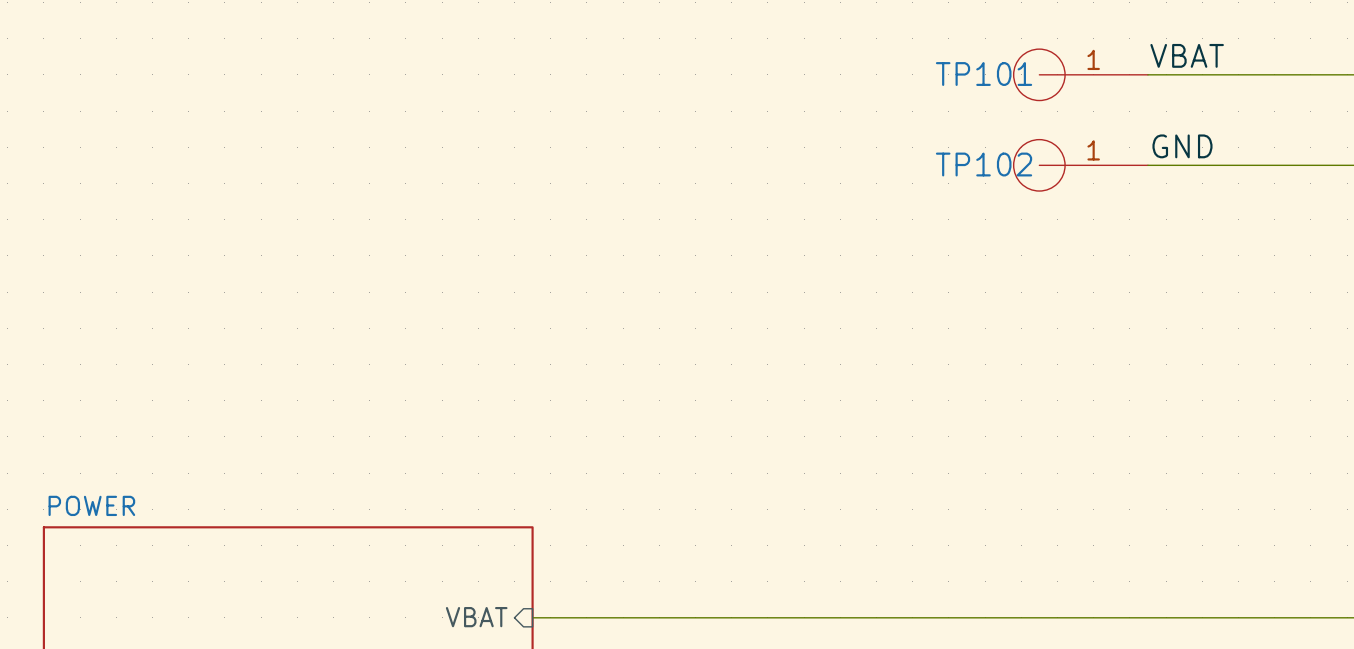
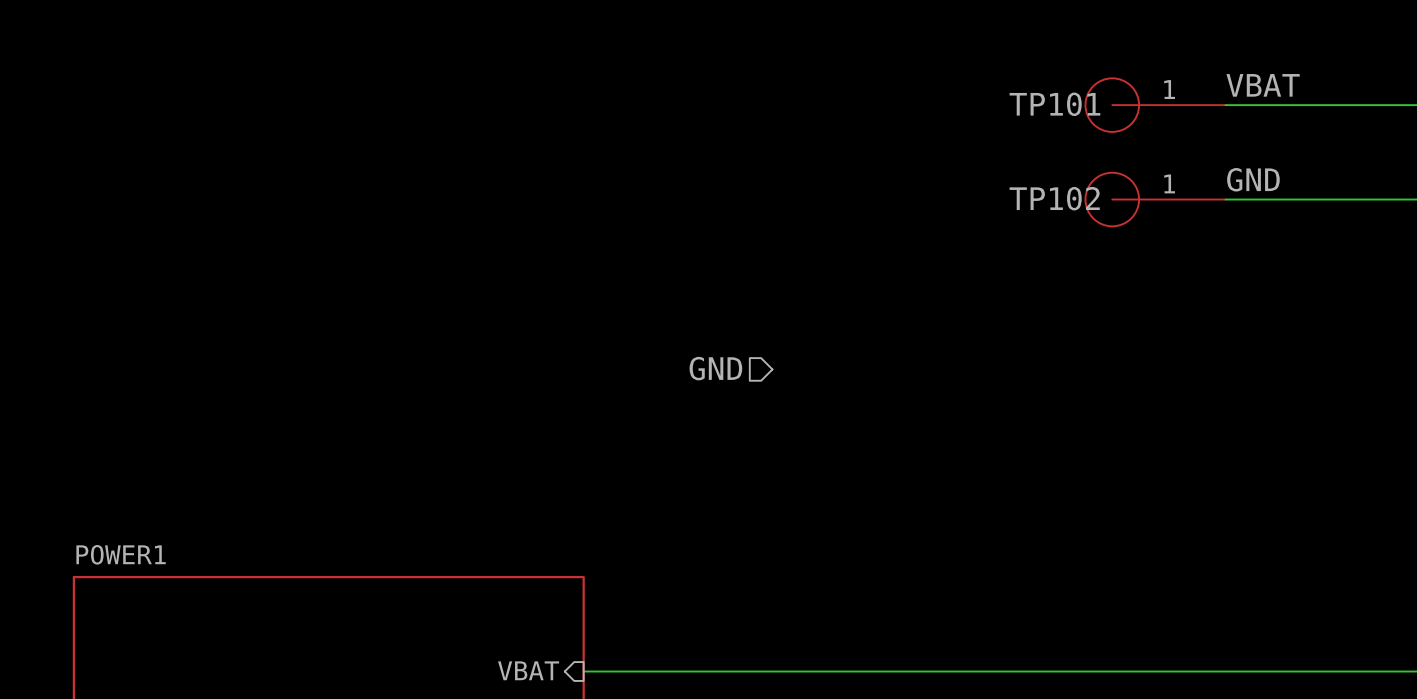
hierarchical label: none -> GND (715, 368)
sheet POWER name: POWER (91, 505) -> POWER1 (121, 554)

